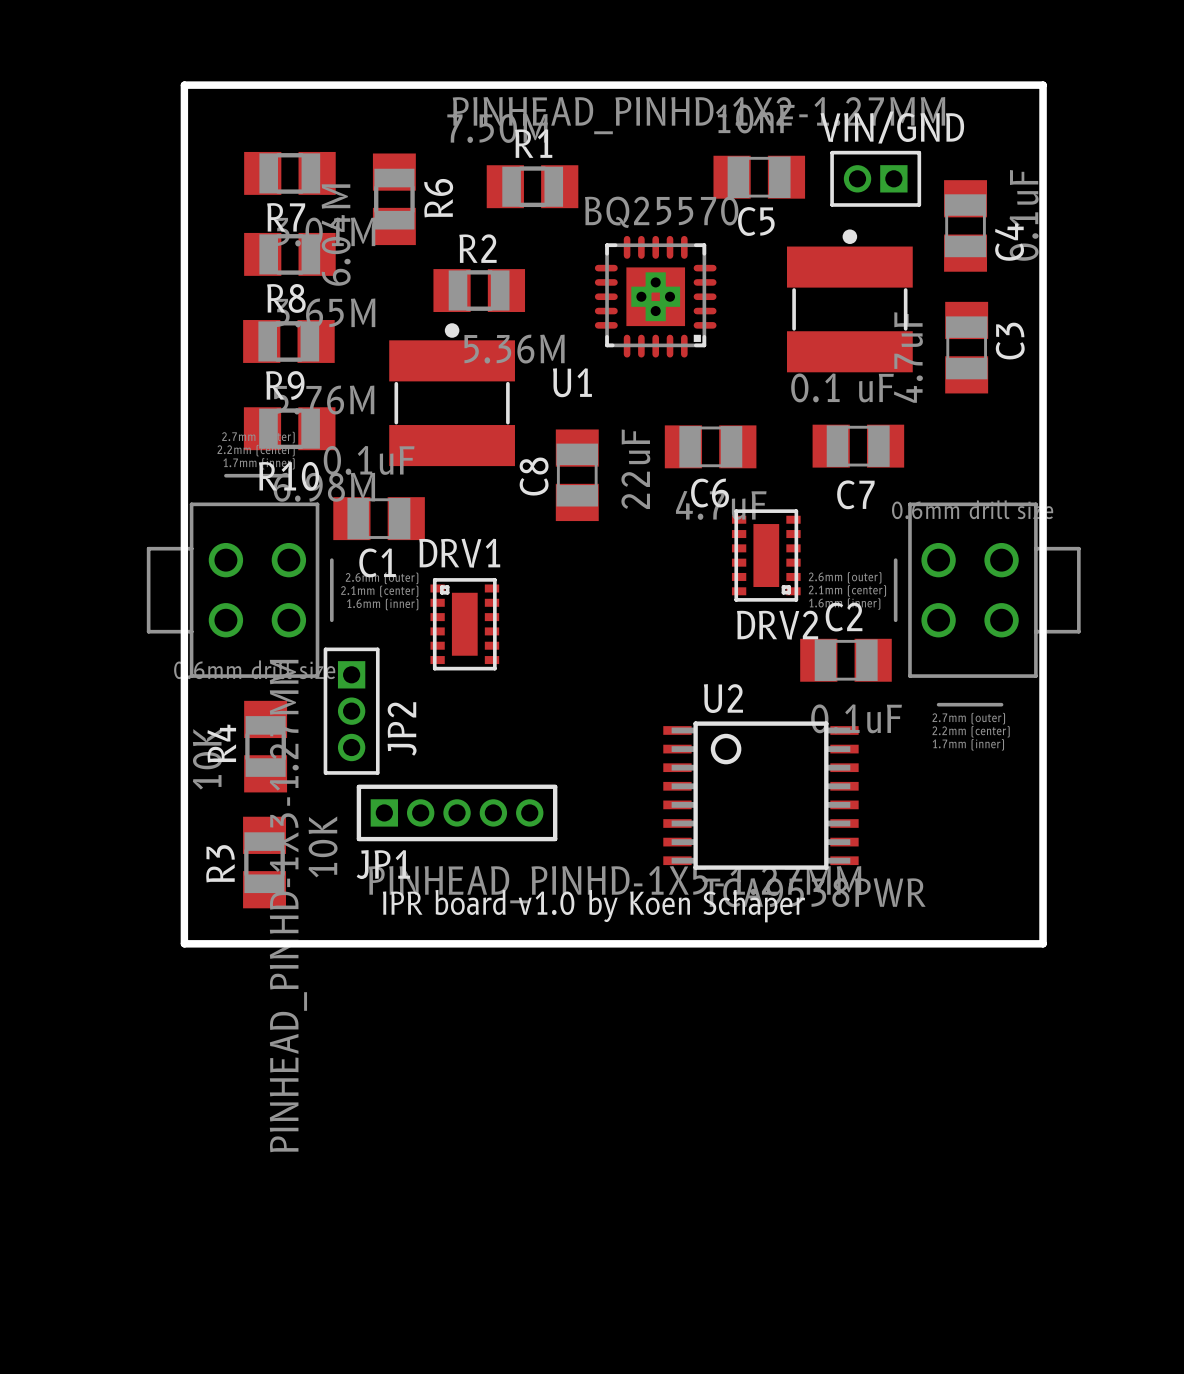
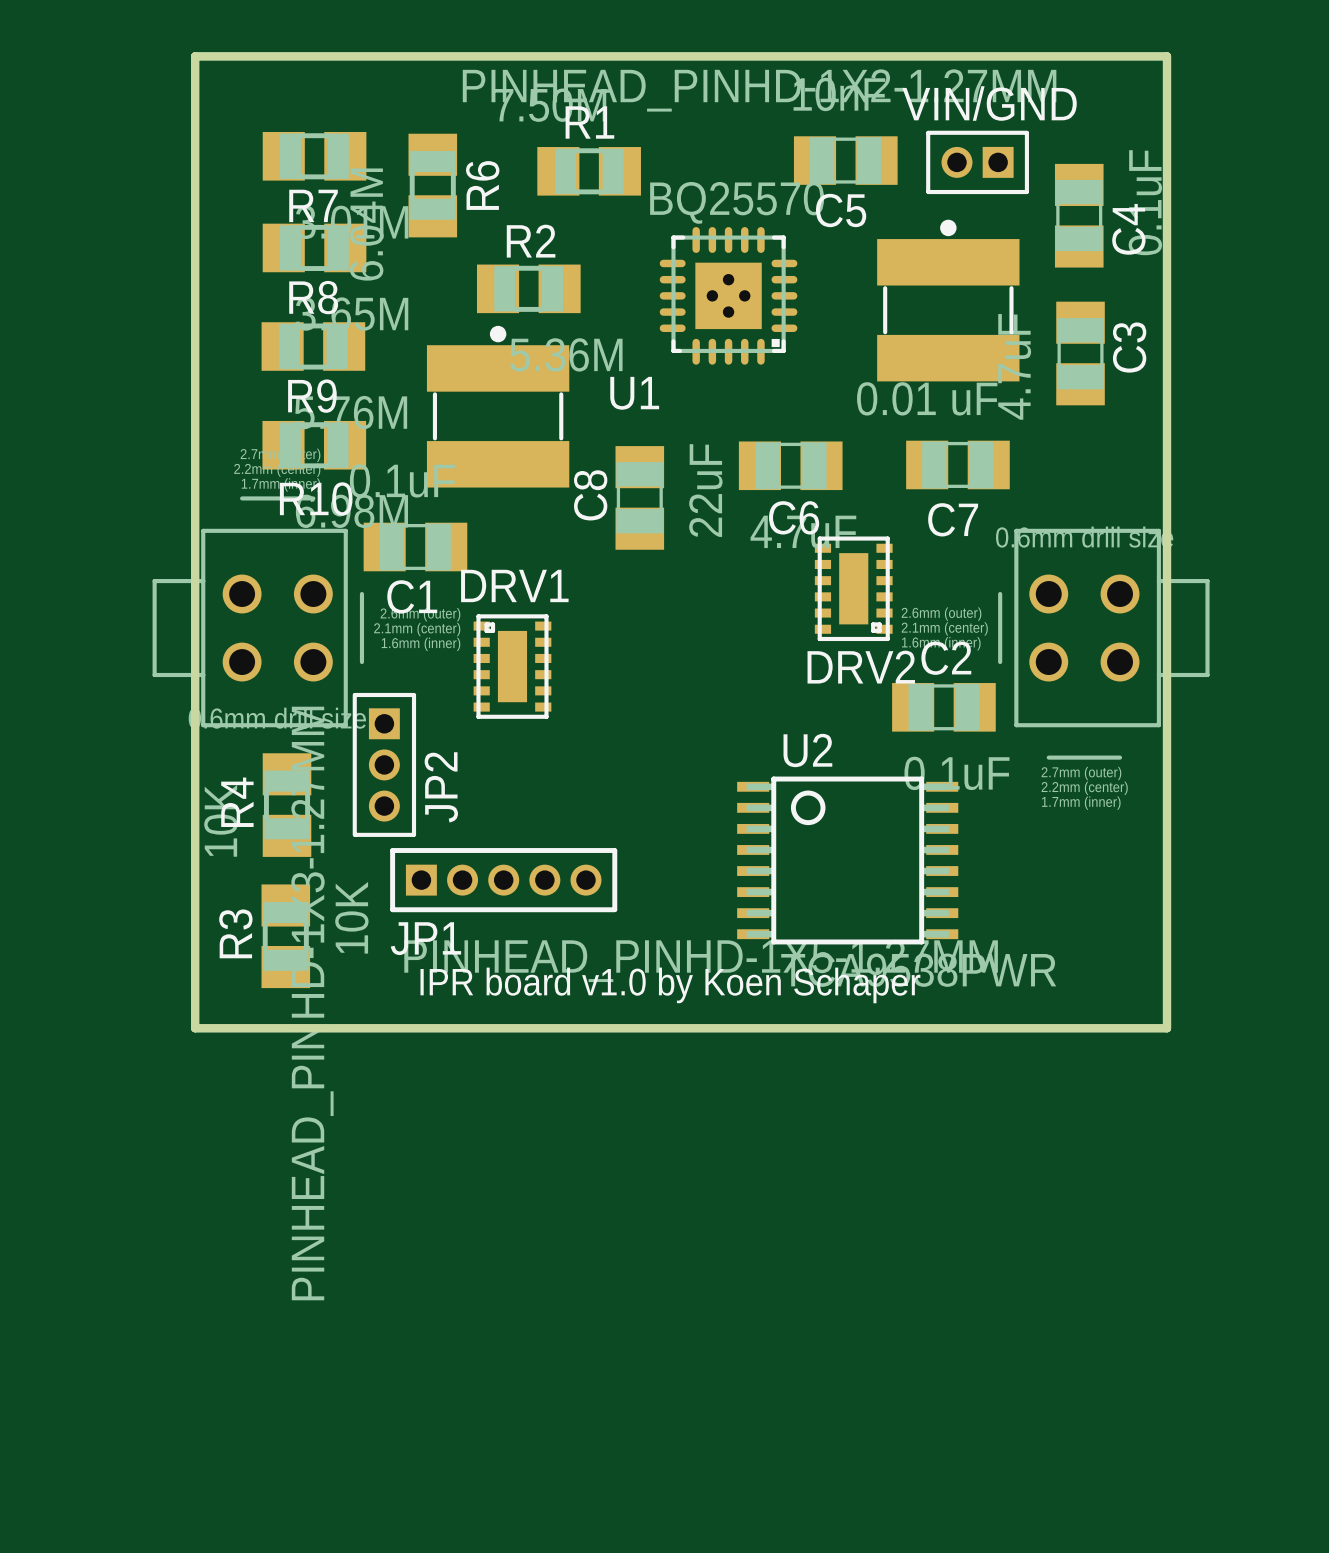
C7 value: 0.1 uF (842, 387) -> 0.01 uF (927, 398)

